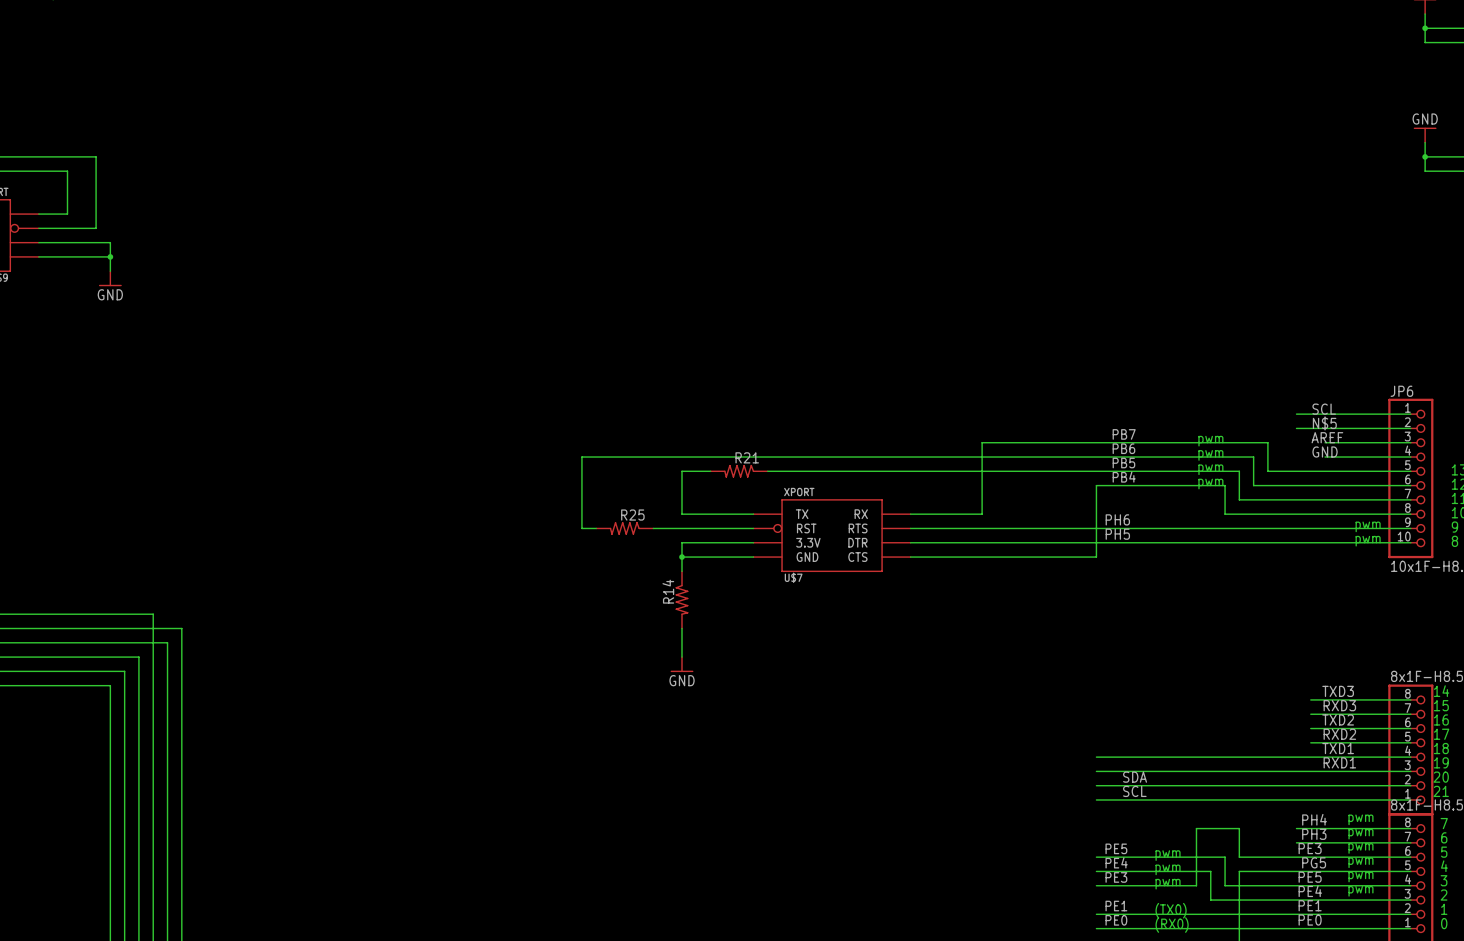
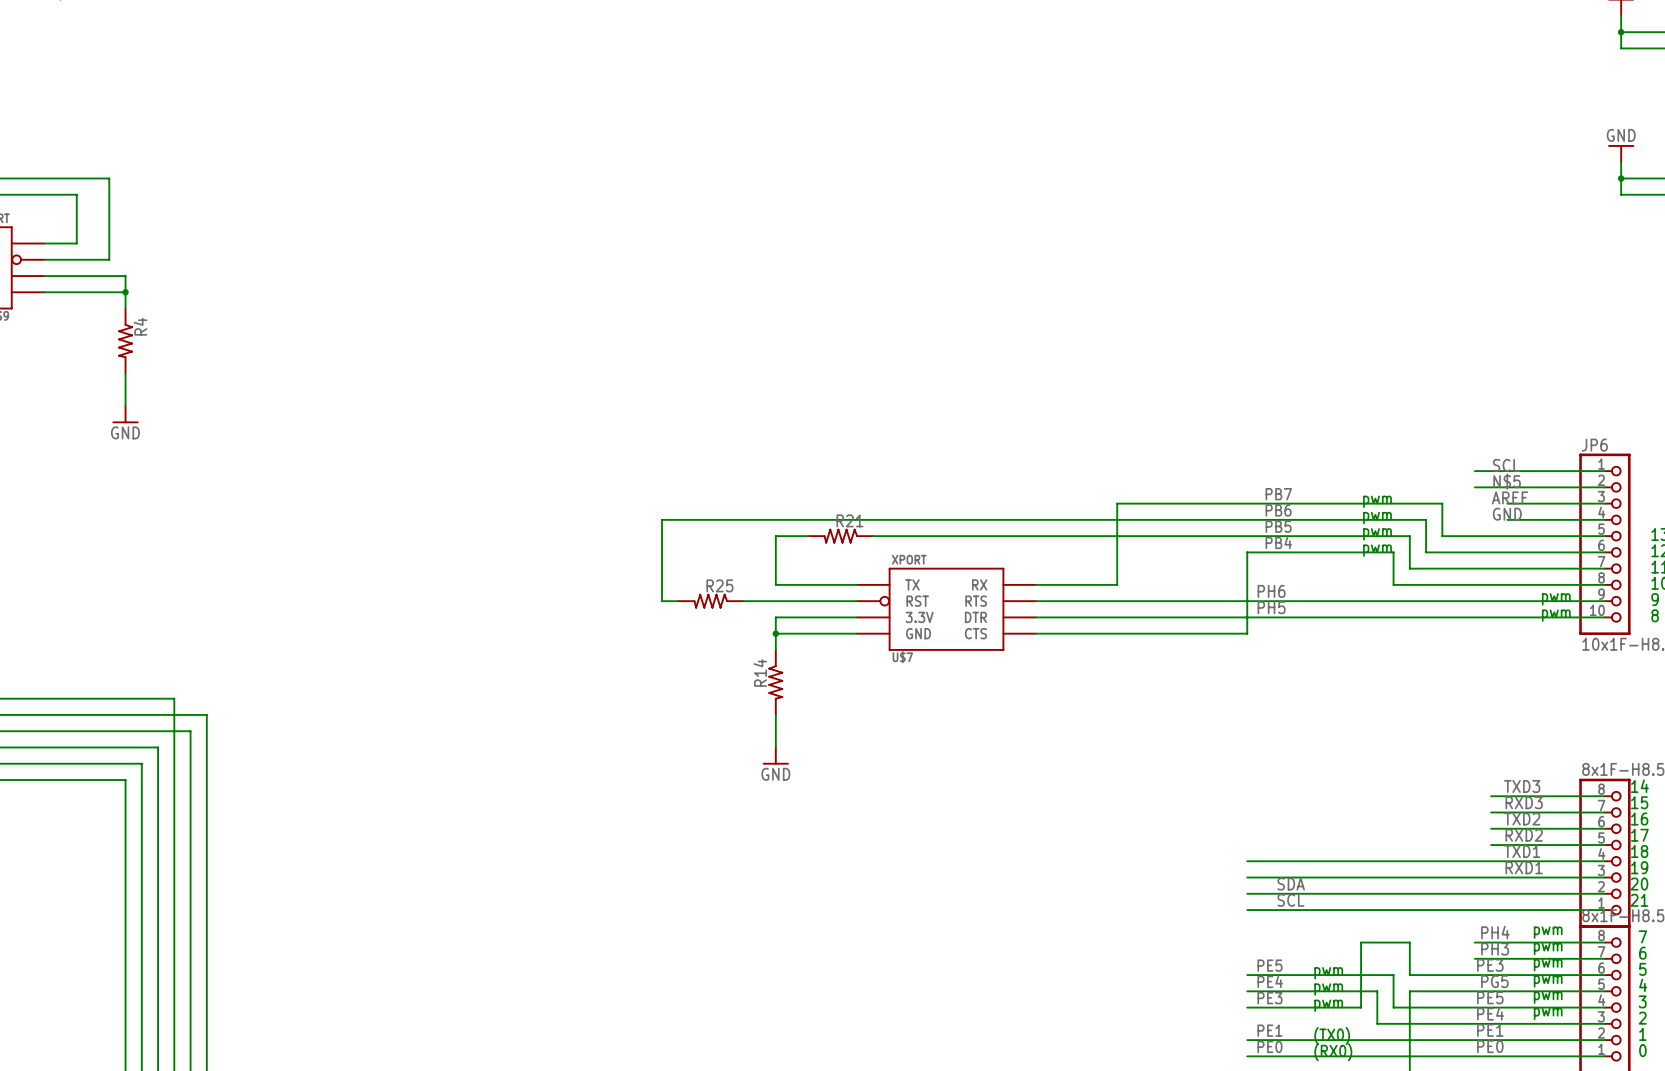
power symbol position: GND (110, 278) -> GND (125, 414)
R4: none -> (125, 341)
wire: none -> (125, 373) (125, 406)

